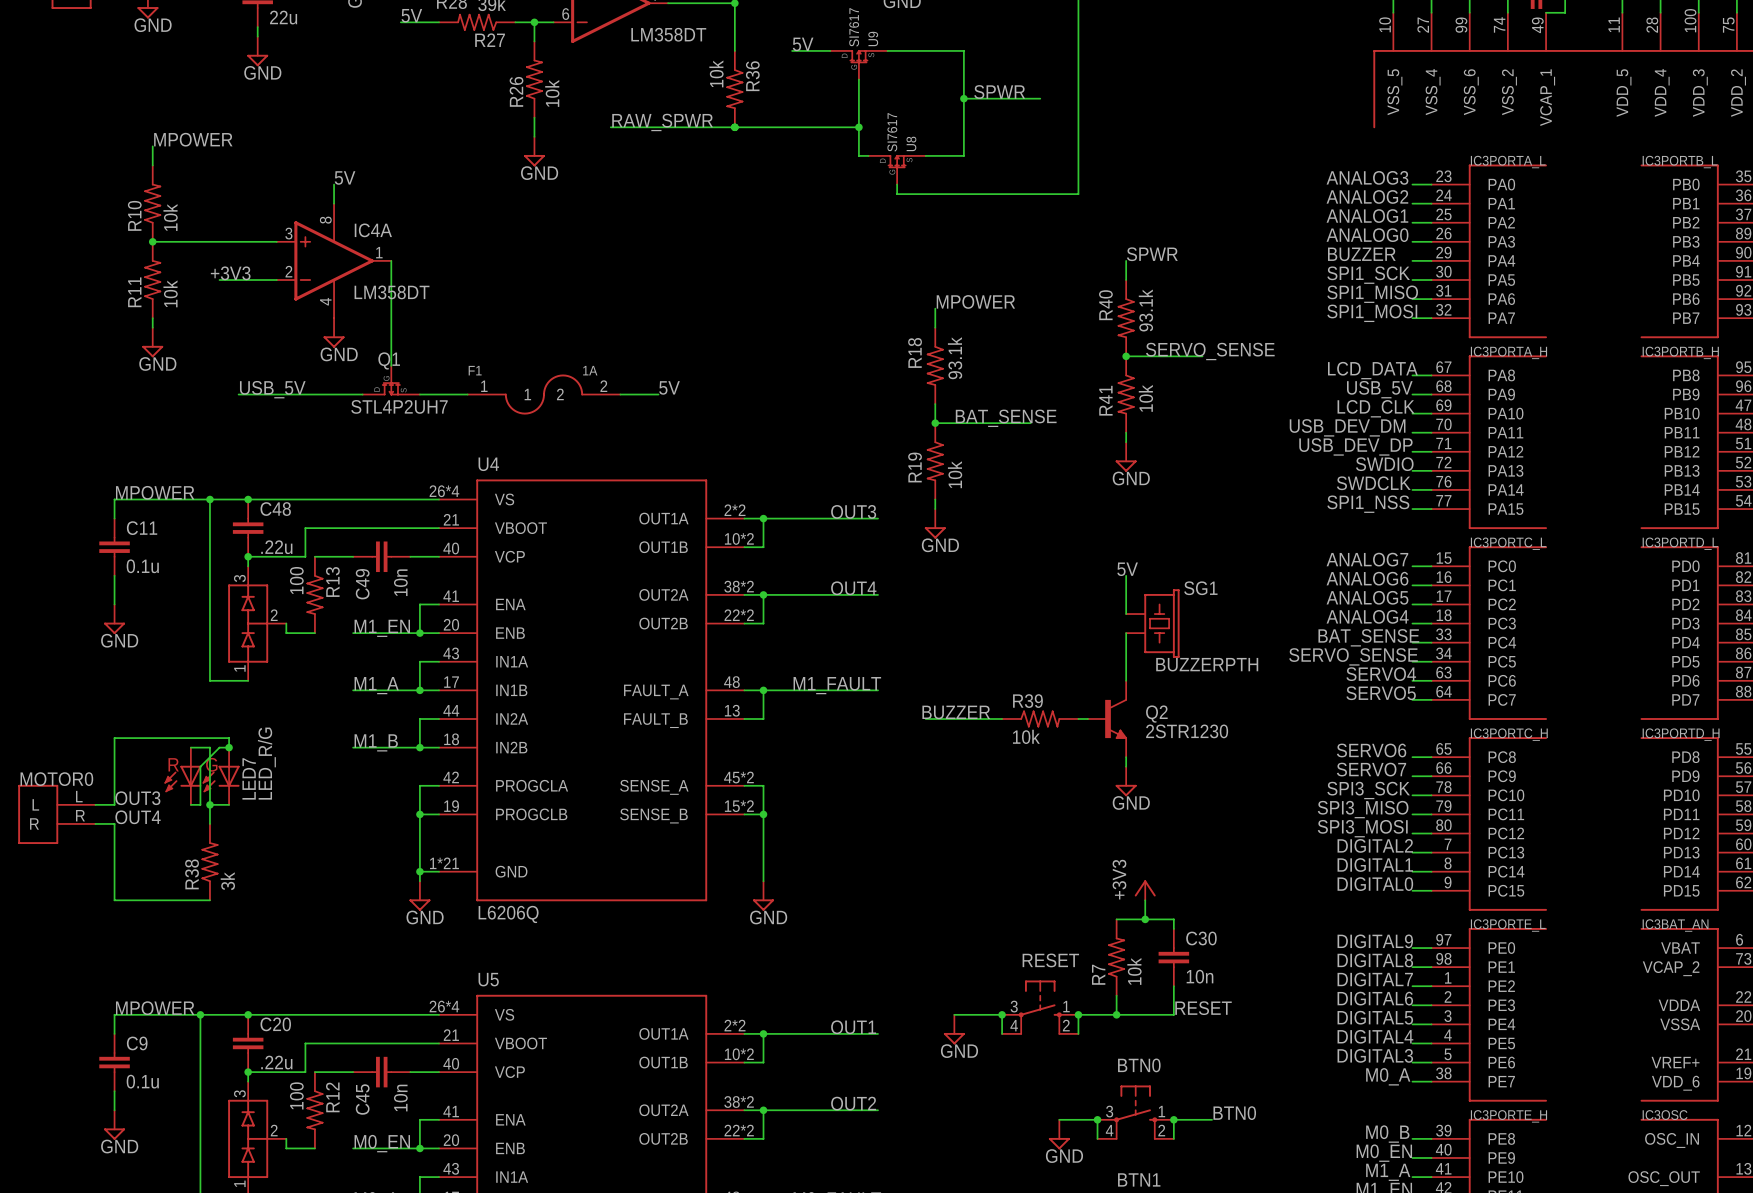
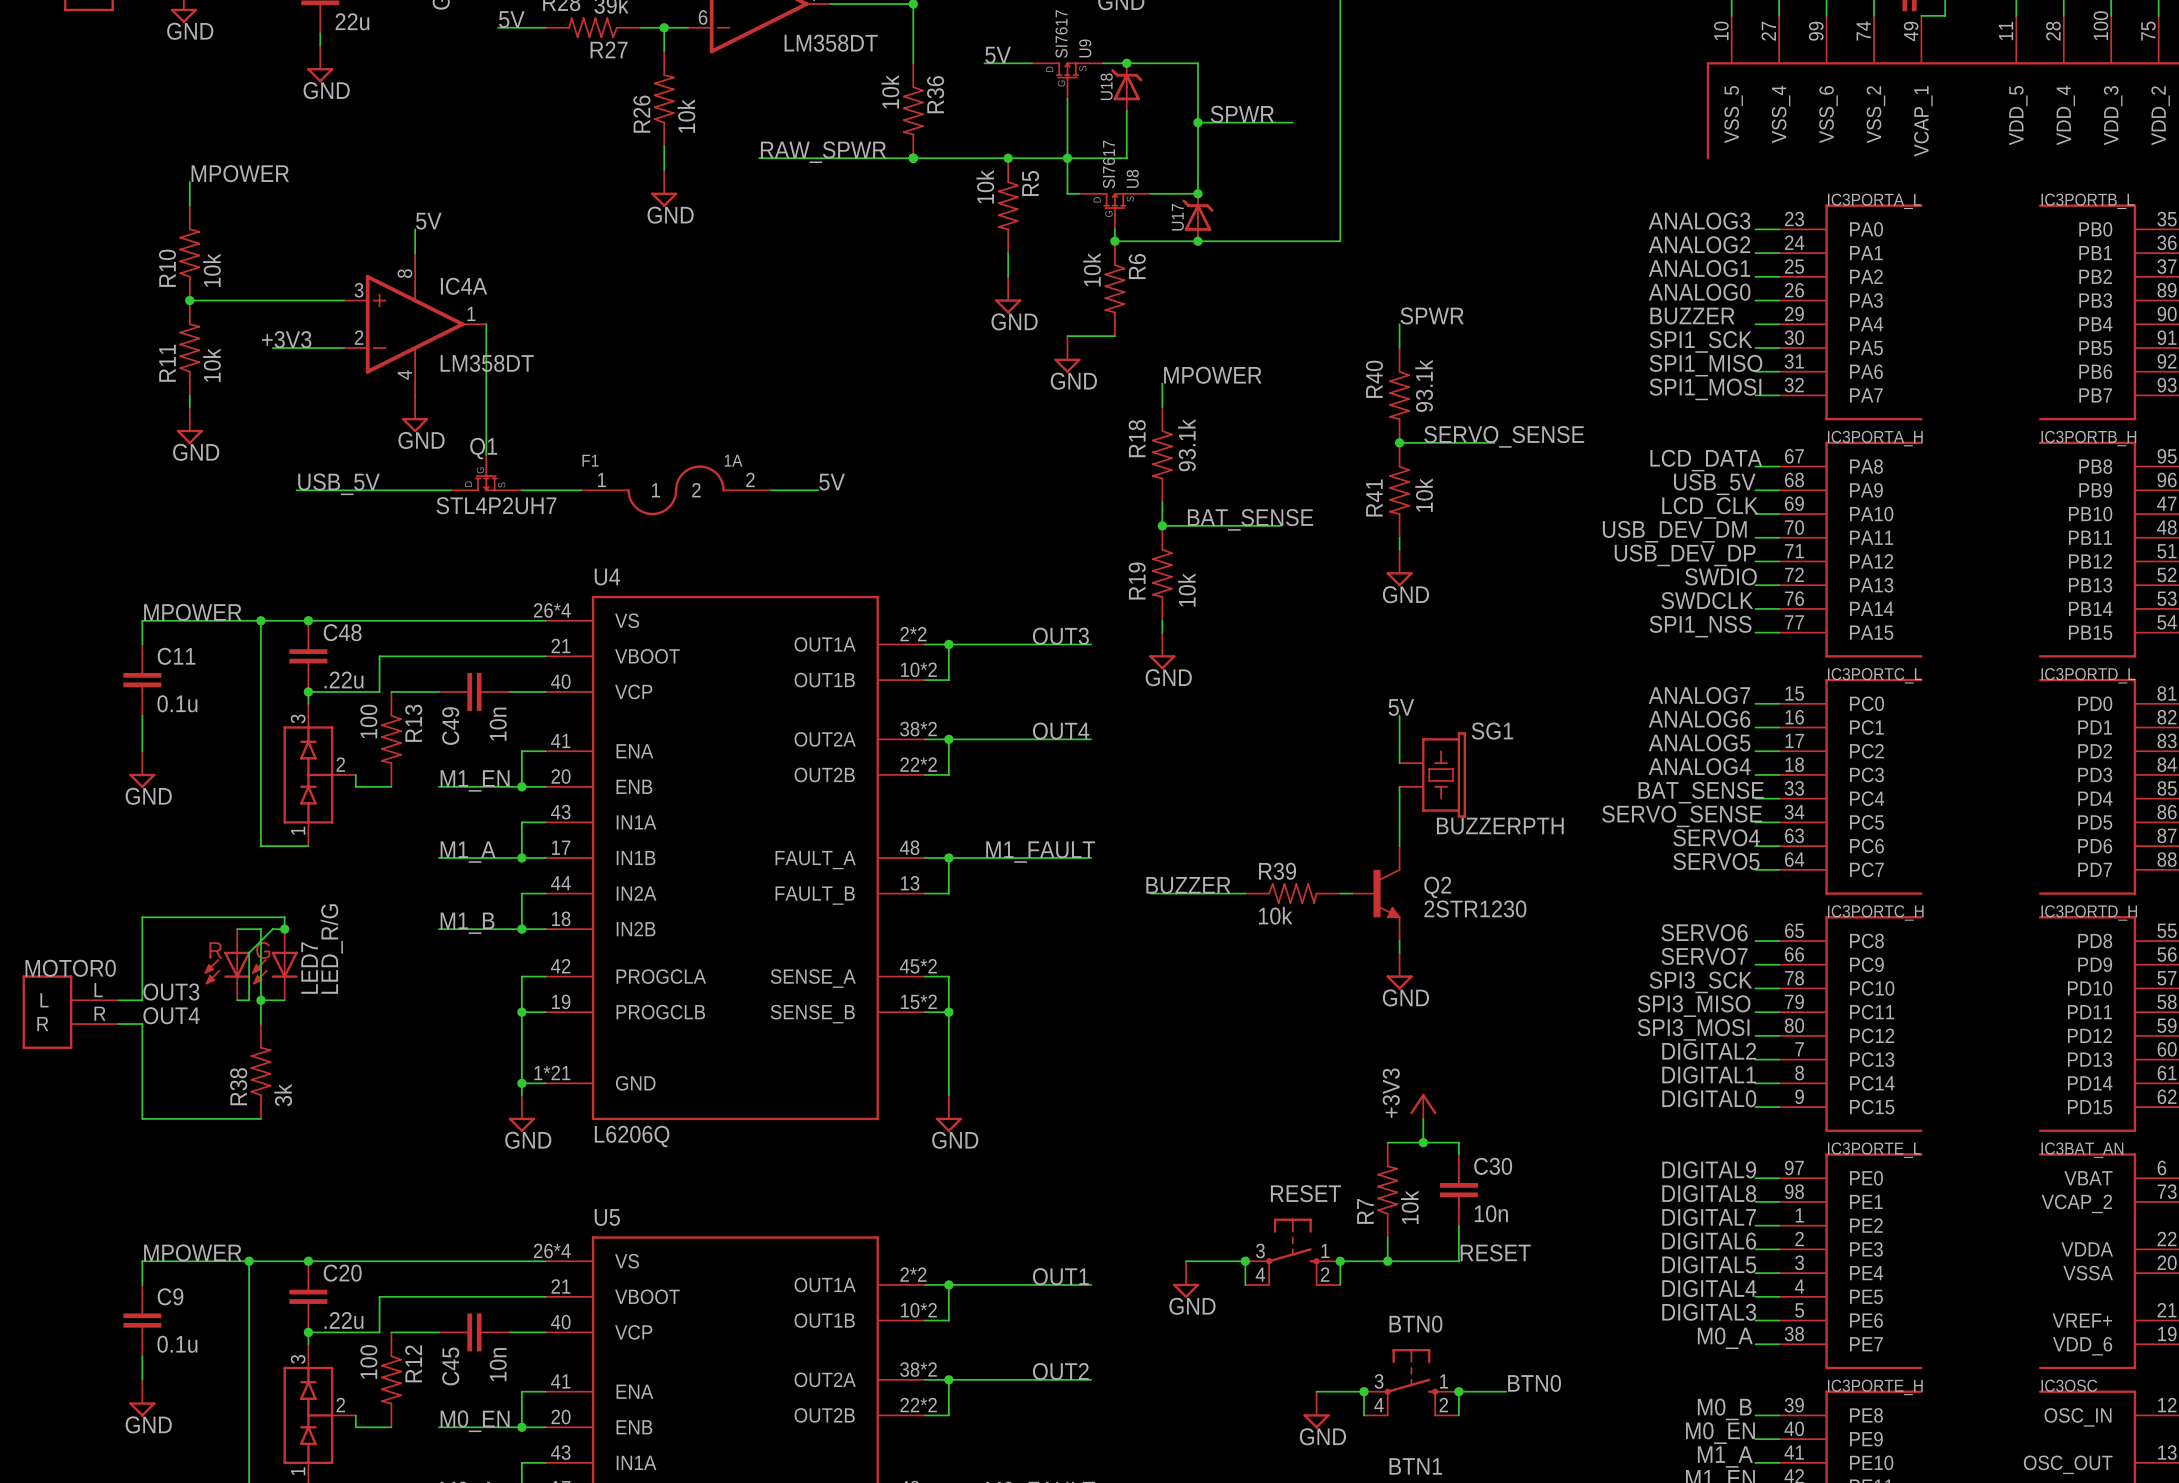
junction: none -> (1126, 63)
U18: none -> (1126, 87)
wire: none -> (1126, 110) (1126, 158) (1067, 158)
junction: none -> (1008, 158)
junction: none -> (1197, 193)
R5: none -> 10k (1008, 205)
U17: none -> (1197, 217)
junction: none -> (1114, 241)
junction: none -> (1197, 241)
wire: none -> (1008, 253) (1008, 276)
R6: none -> 10k (1114, 288)
power symbol: none -> GND (1008, 295)
wire: none -> (1067, 336) (1114, 336)
power symbol: none -> GND (1067, 354)

